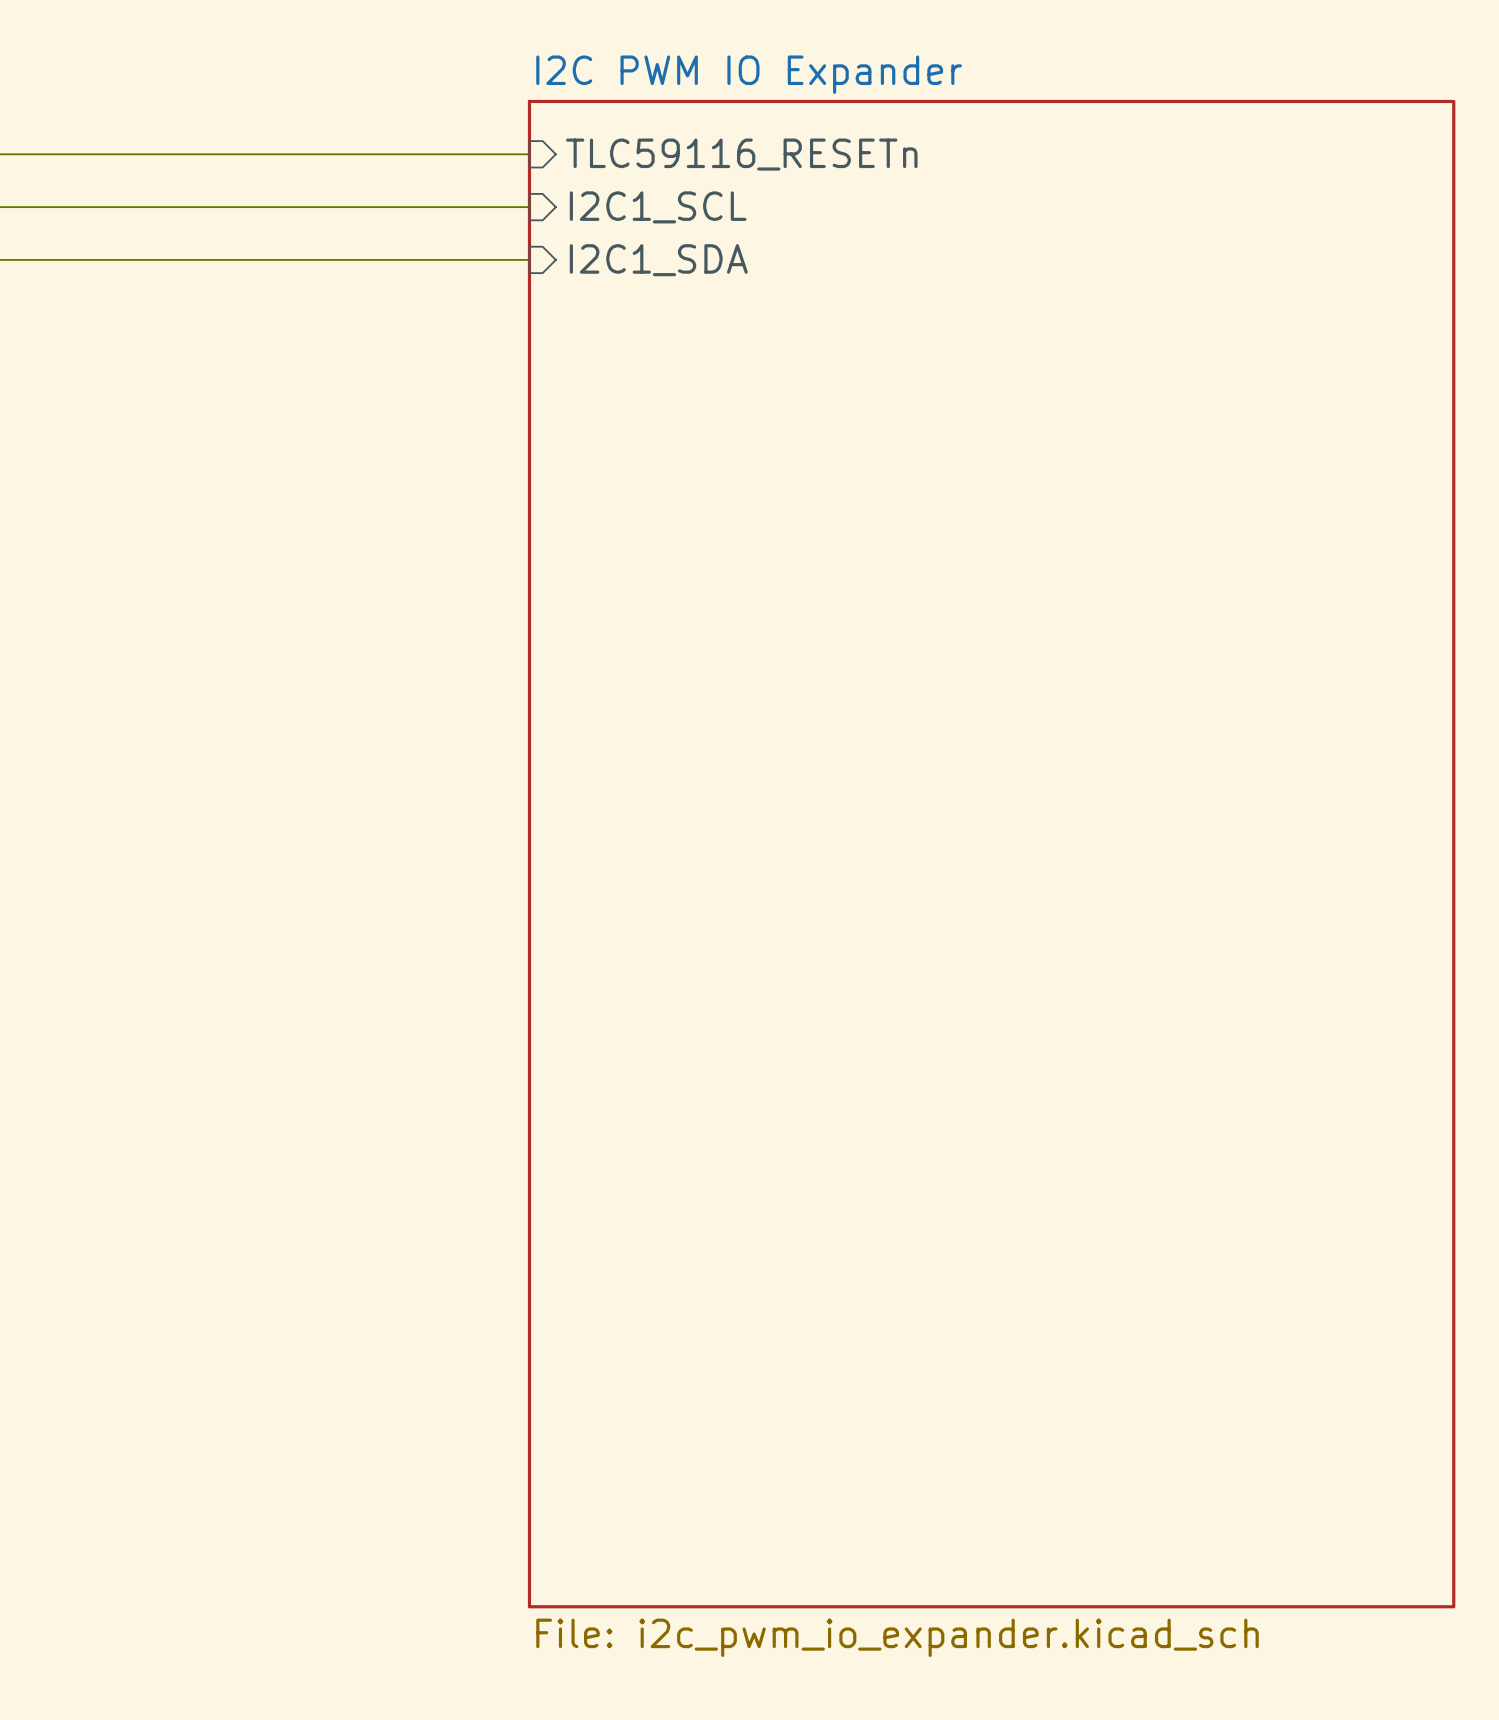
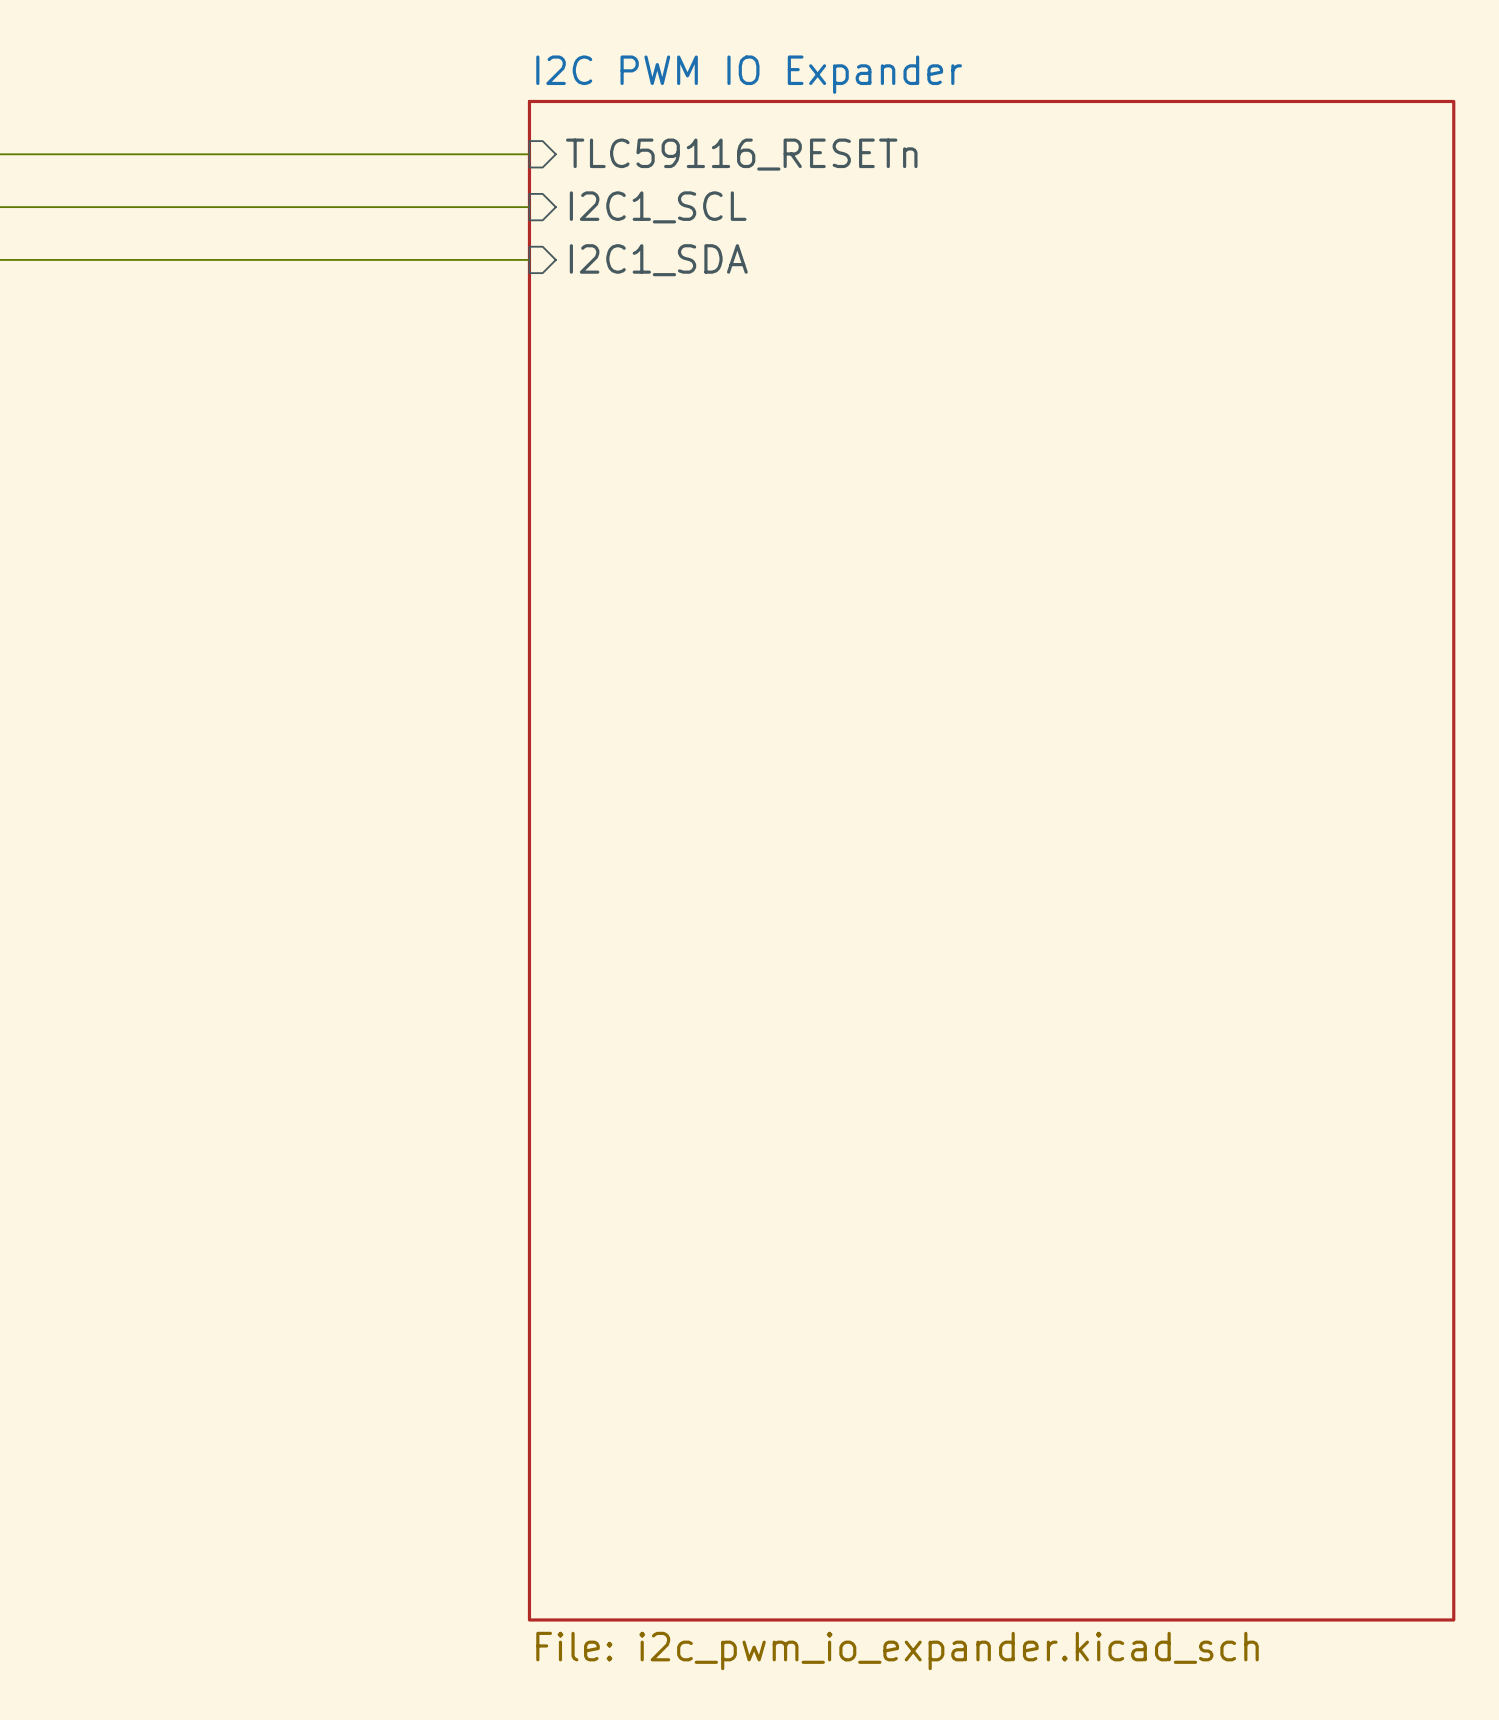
sheet I2C PWM IO Expander shape: [527, 99, 1456, 1609] -> [527, 99, 1456, 1622]
sheet I2C PWM IO Expander value position: File: i2c_pwm_io_expander.kicad_sch (897, 1637) -> File: i2c_pwm_io_expander.kicad_sch (897, 1650)

